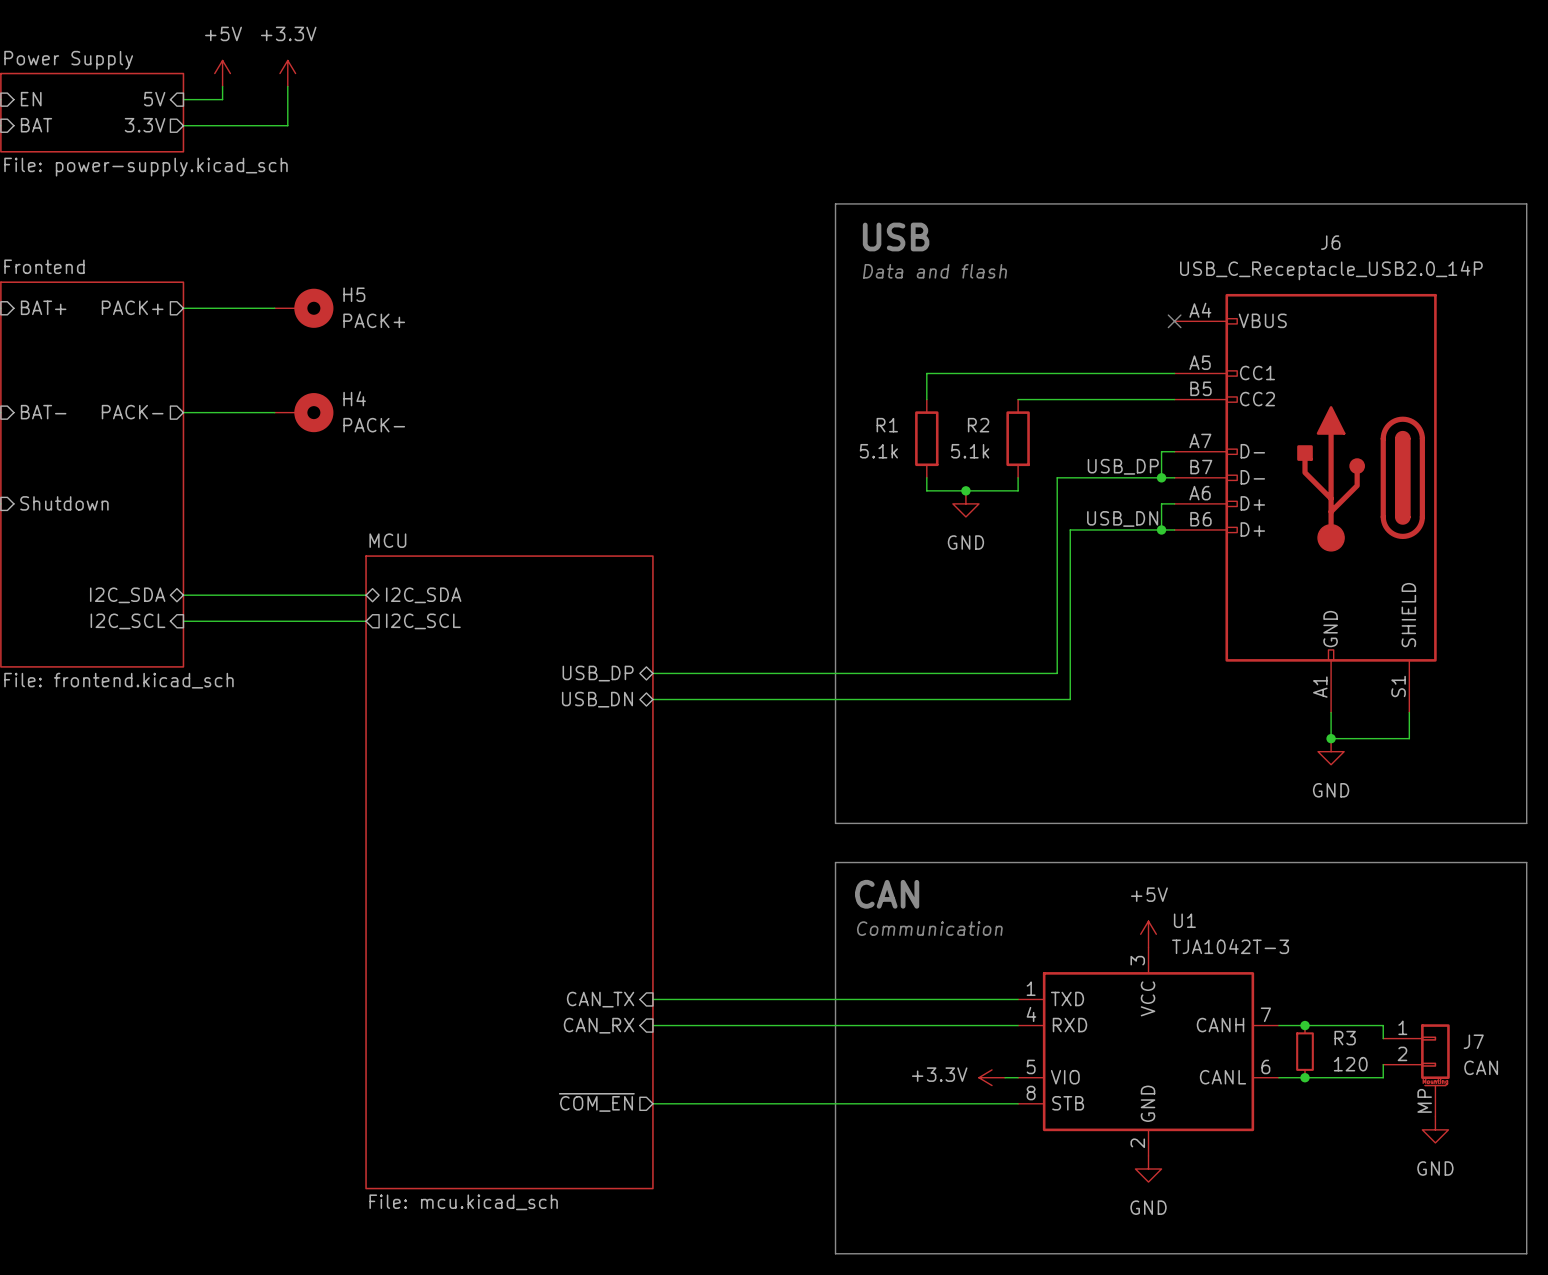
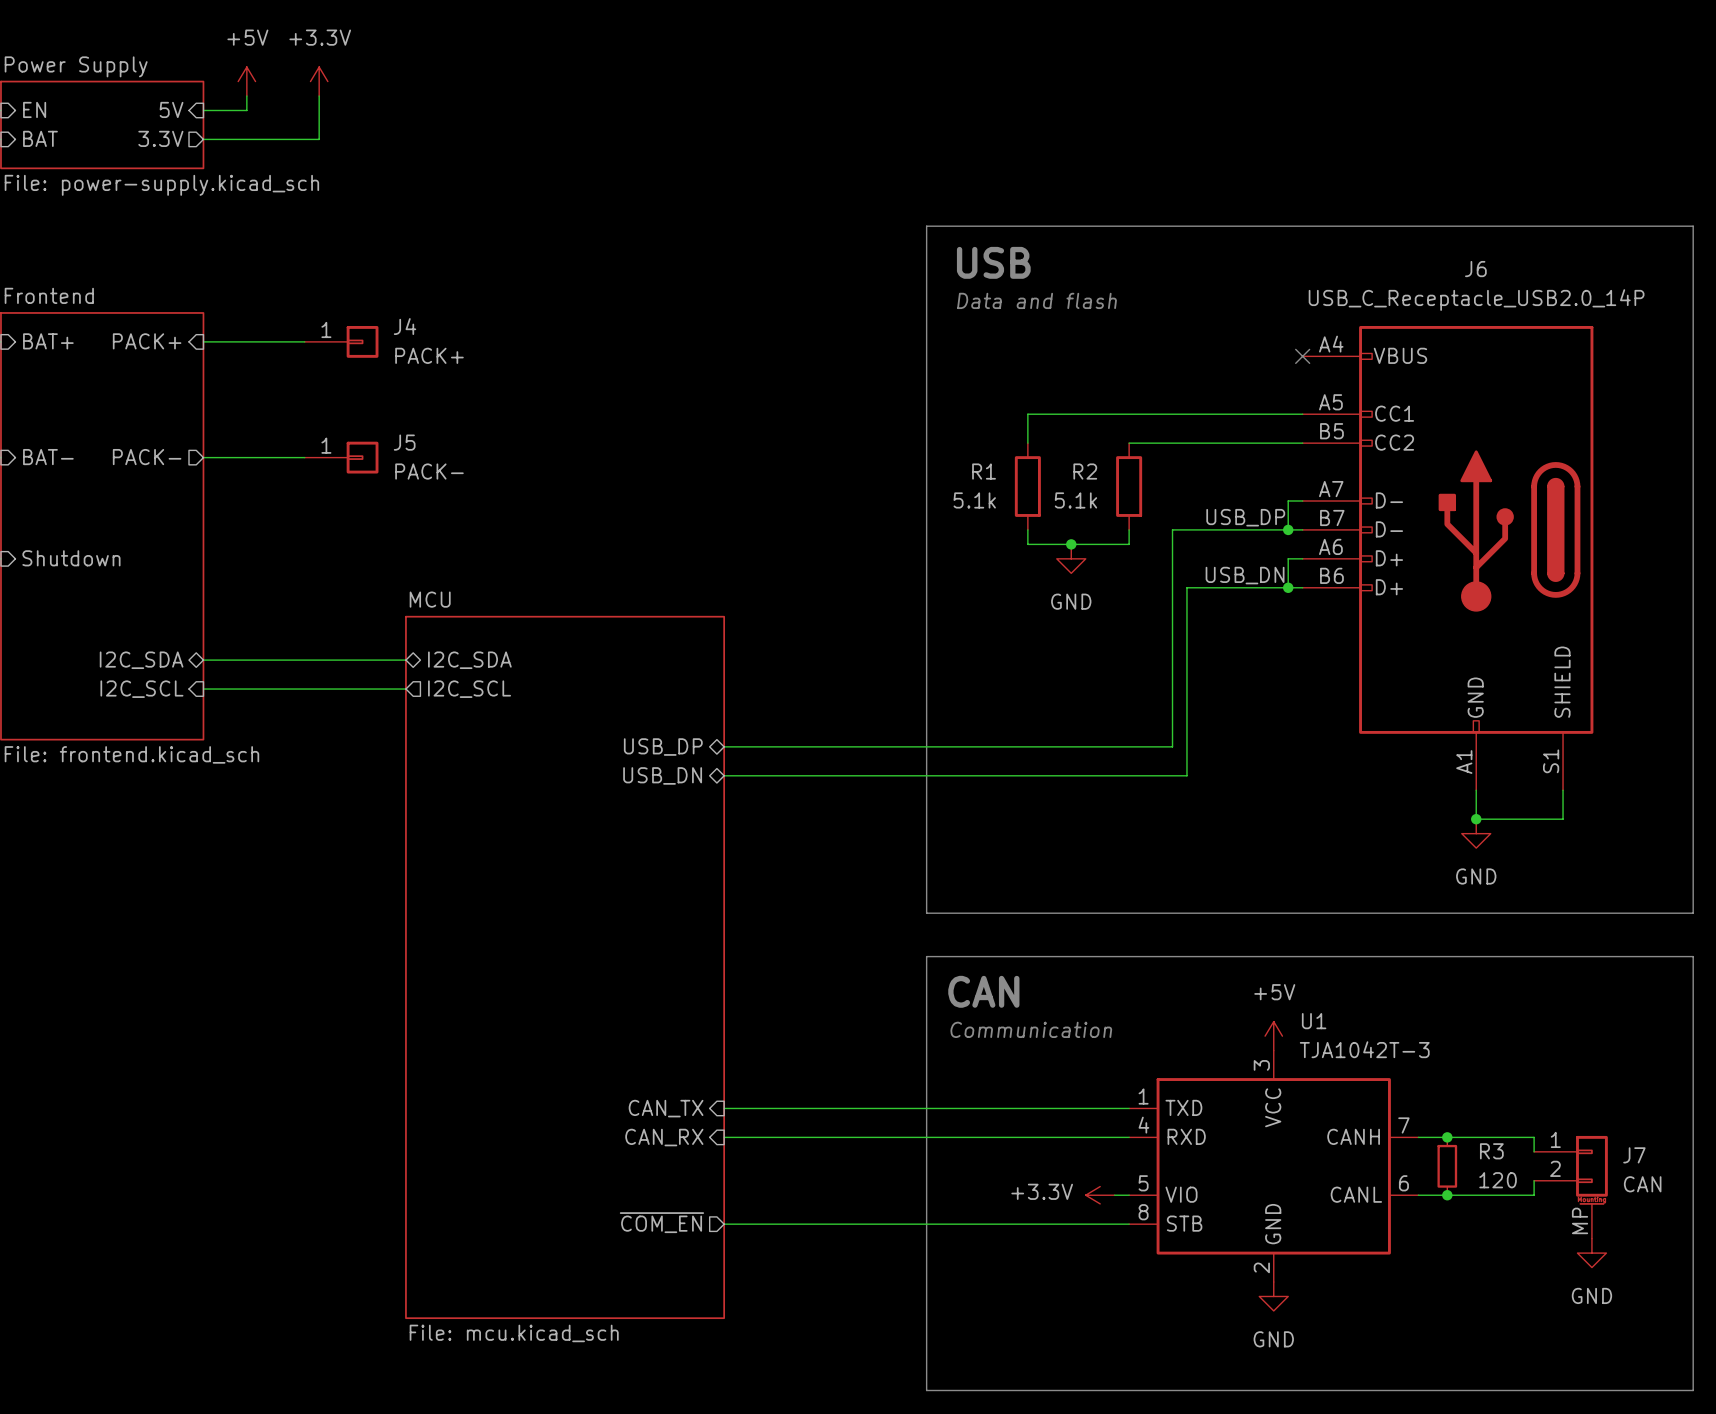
sheet pin shape: output (132, 307) -> input (147, 341)
H5: PACK+ (304, 308) -> none
J4: none -> PACK+ (341, 341)
H4: PACK- (304, 412) -> none
J5: none -> PACK- (341, 457)

